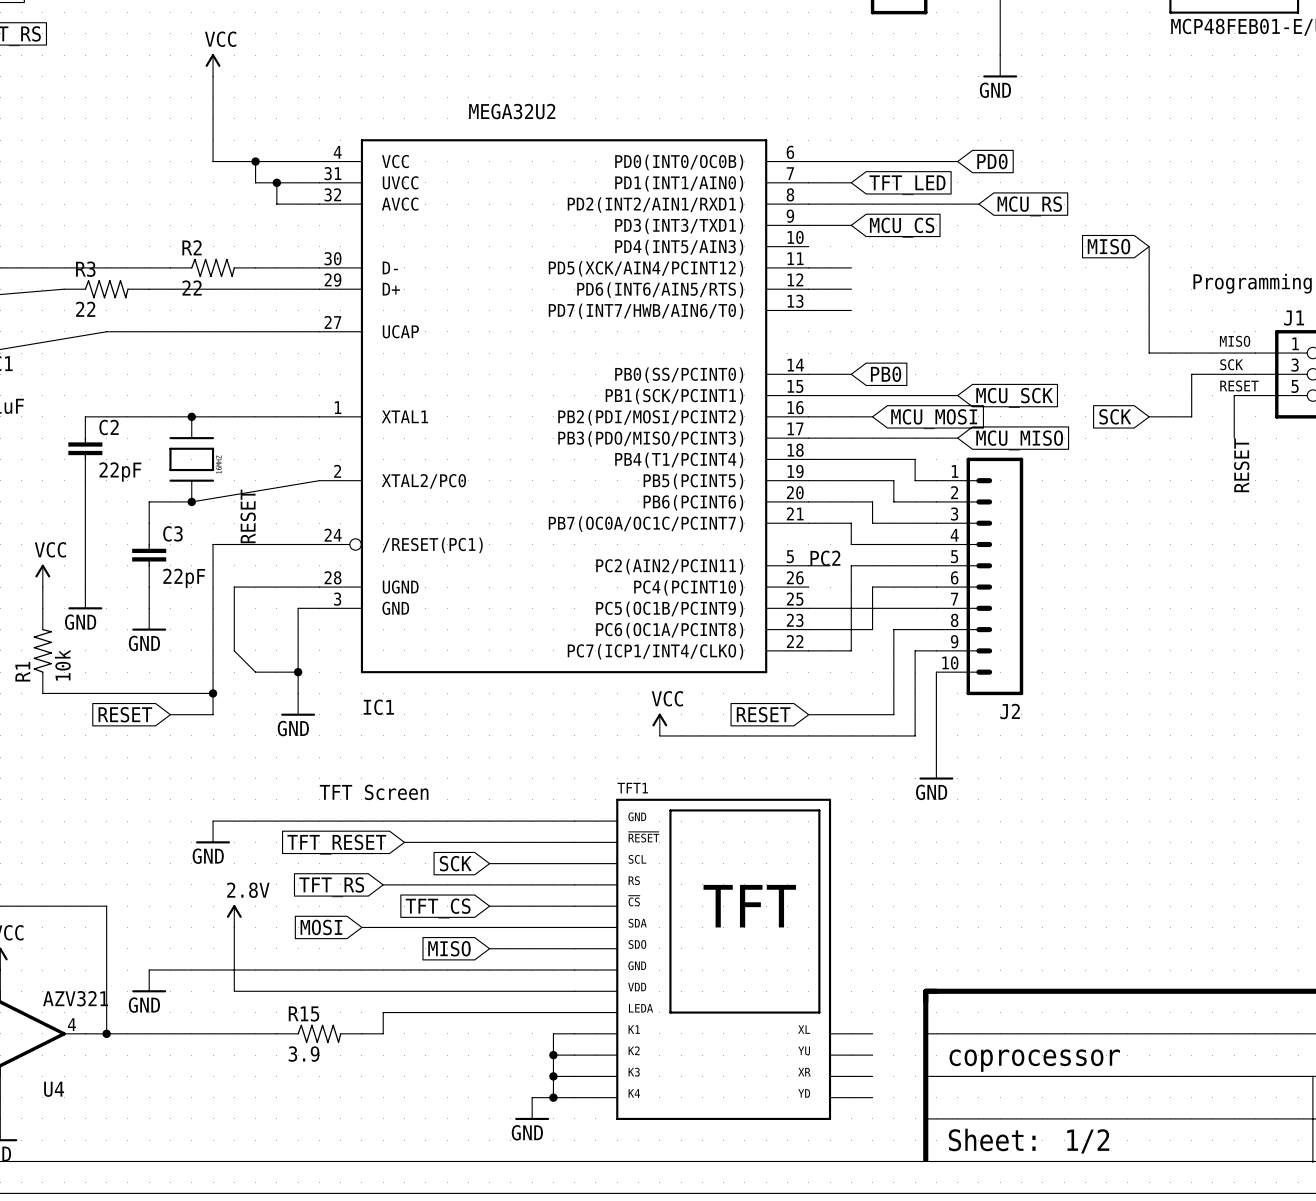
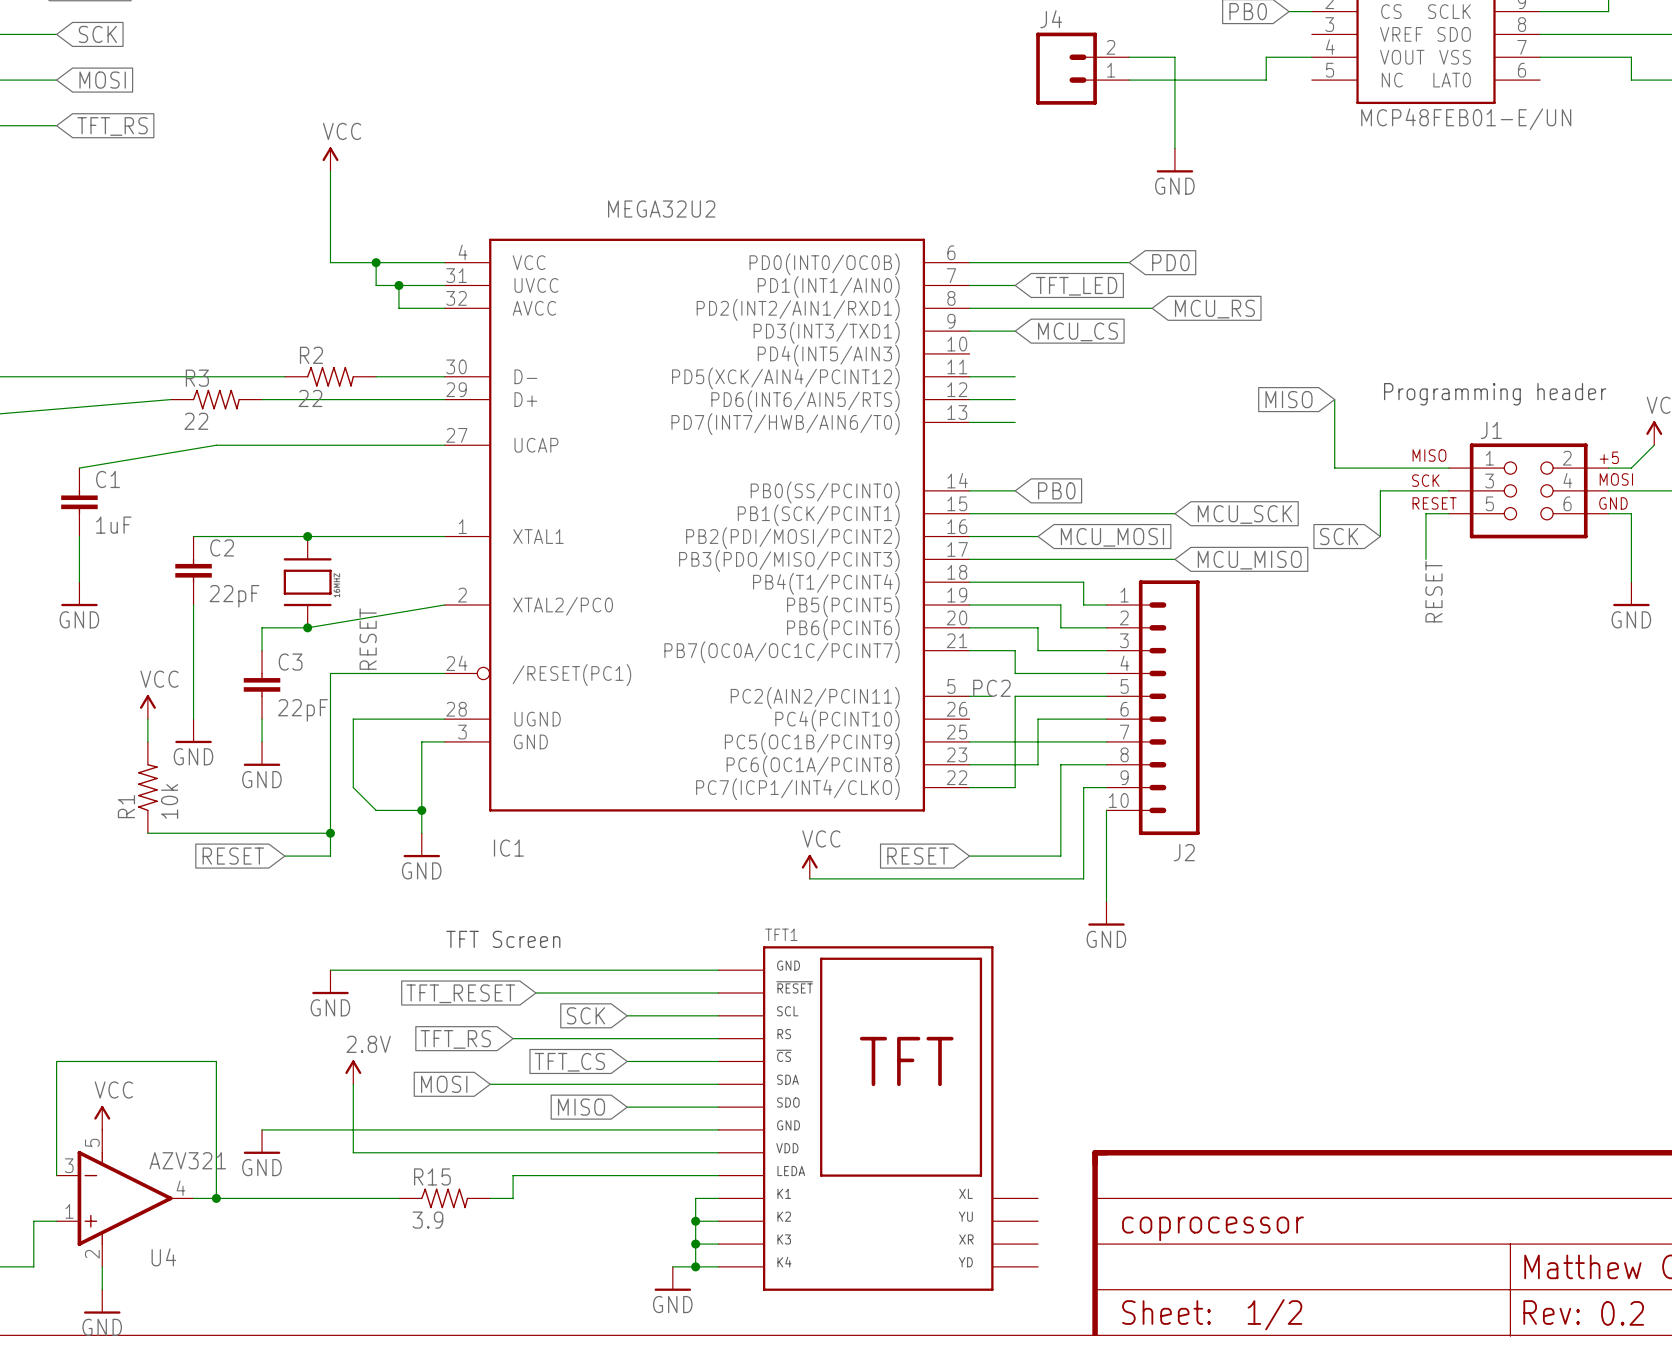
global label position: MISO (1108, 246) -> MISO (1289, 399)
wire: (1149, 246) (1149, 289) -> none
global label position: MCU_SCK (1014, 397) -> MCU_SCK (1244, 514)
global label position: SCK (1115, 416) -> SCK (1339, 536)
wire: (1149, 416) (1191, 416) -> (1129, 513) (1174, 513)
wire: none -> (1129, 559) (1174, 559)
global label position: MCU_MISO (1019, 440) -> MCU_MISO (1249, 560)

